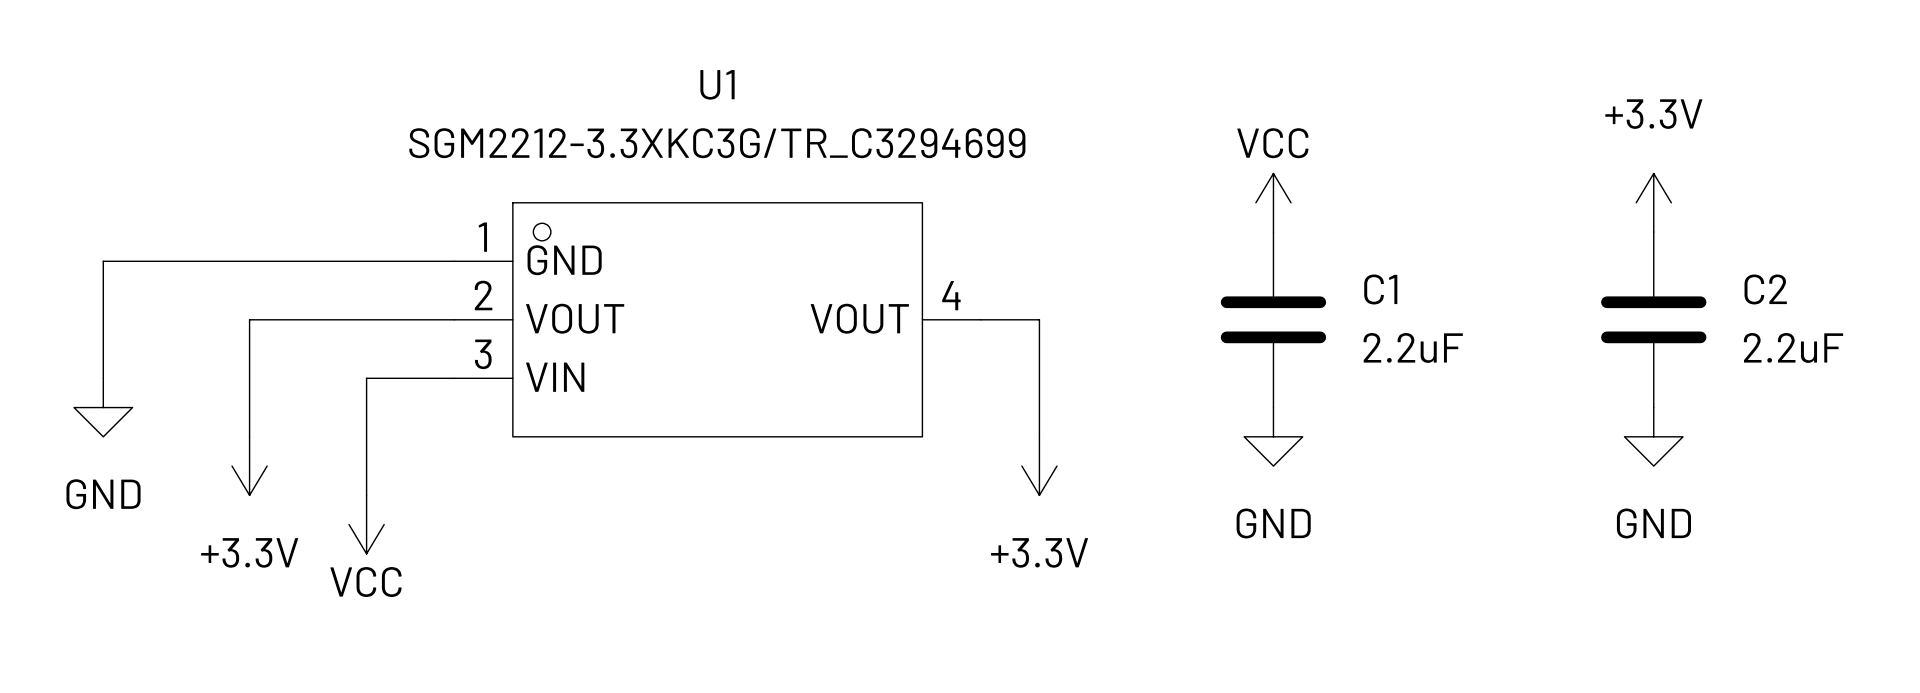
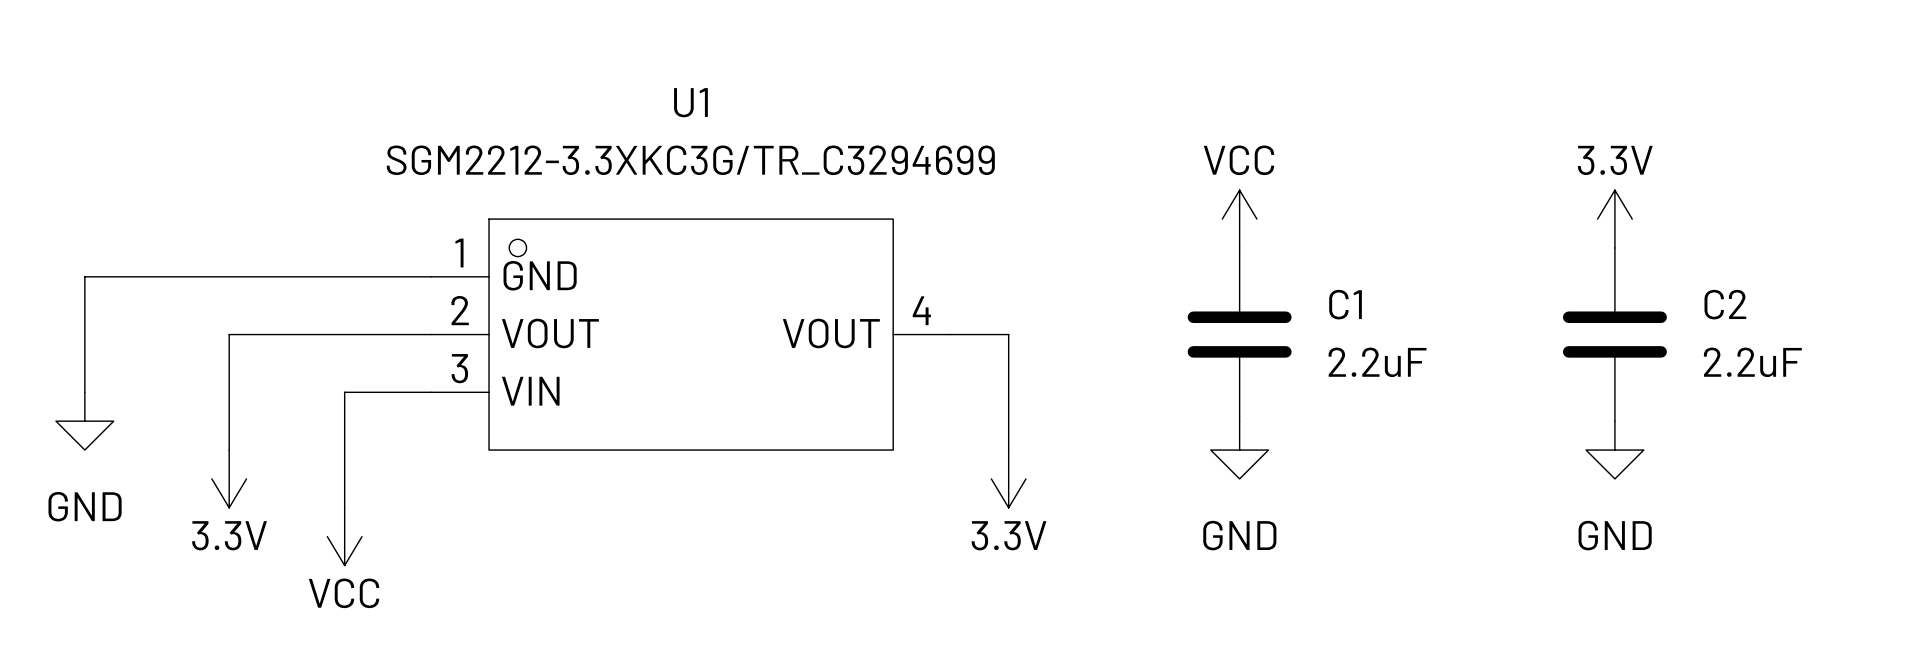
power symbol: +3.3V (1653, 202) -> 3.3V (1614, 219)
power symbol: +3.3V (249, 466) -> 3.3V (229, 478)
power symbol: +3.3V (1039, 466) -> 3.3V (1008, 478)

